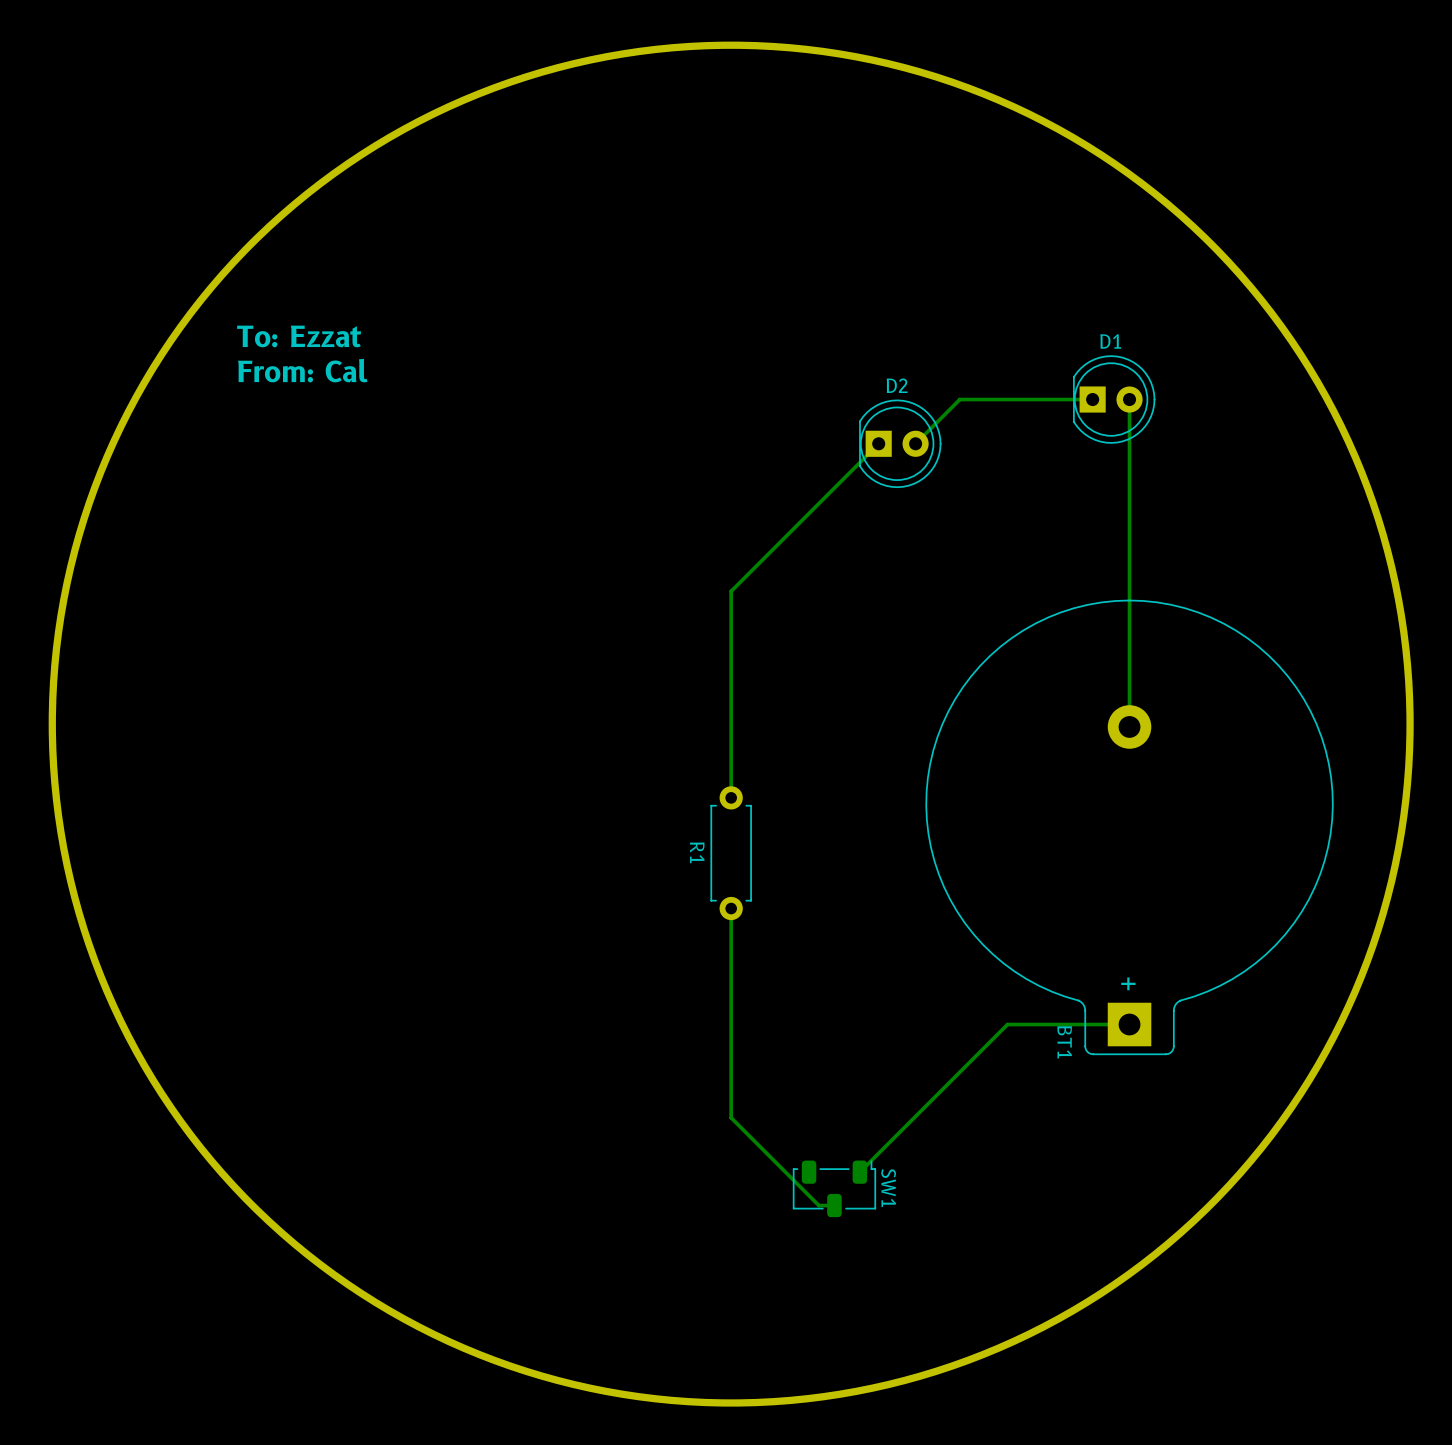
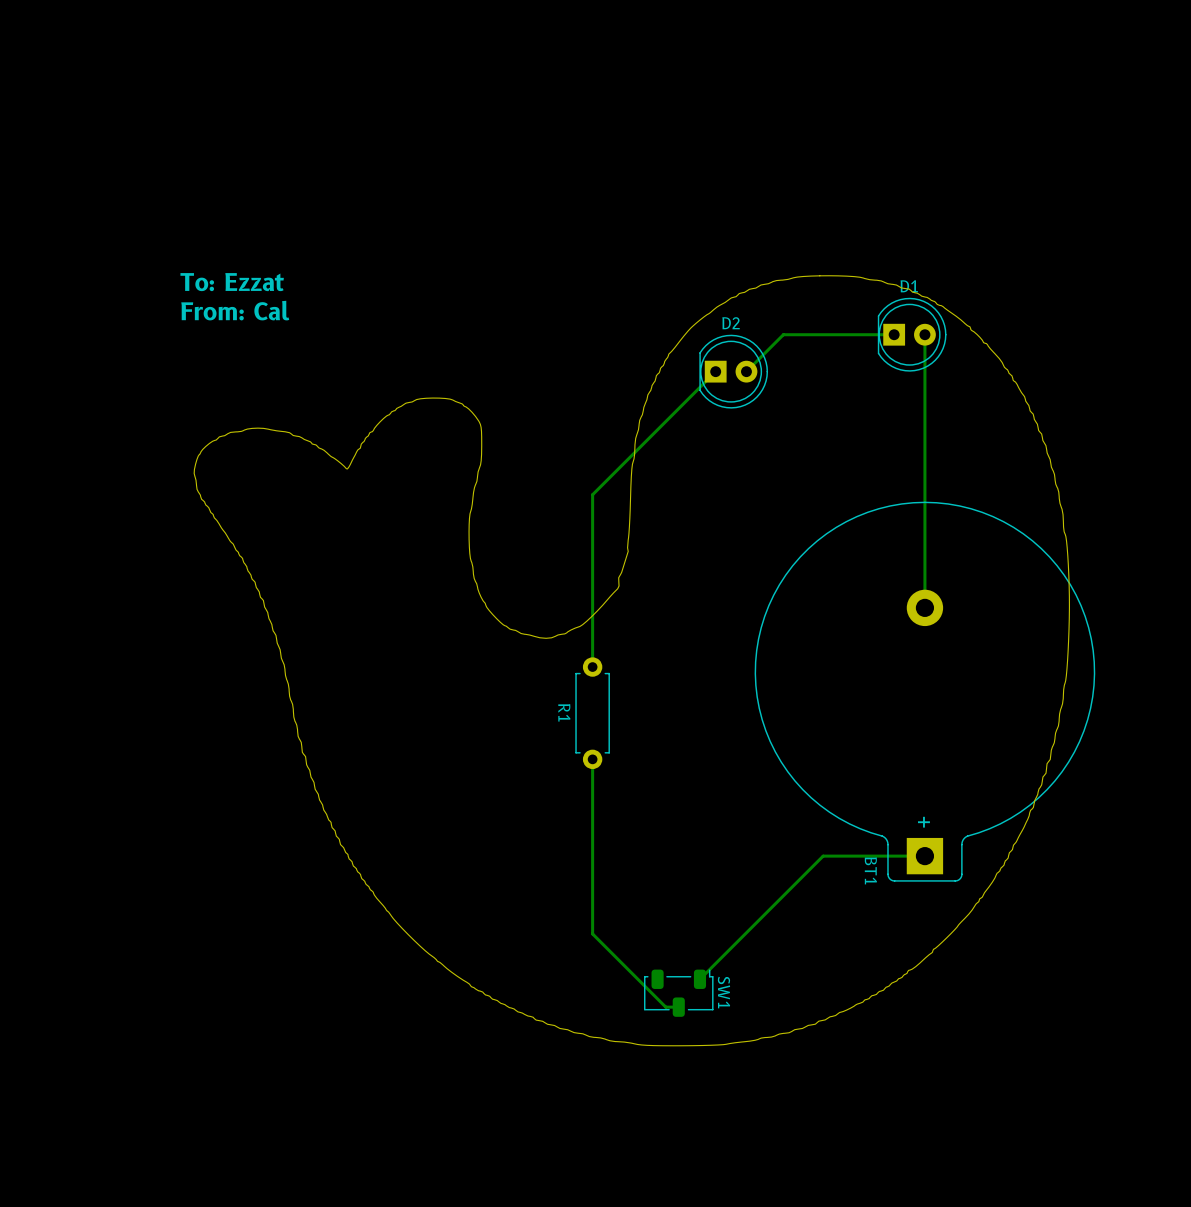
round board edge: [48, 41, 1414, 1407] -> none
drawing: none -> [194, 275, 1070, 1046]

